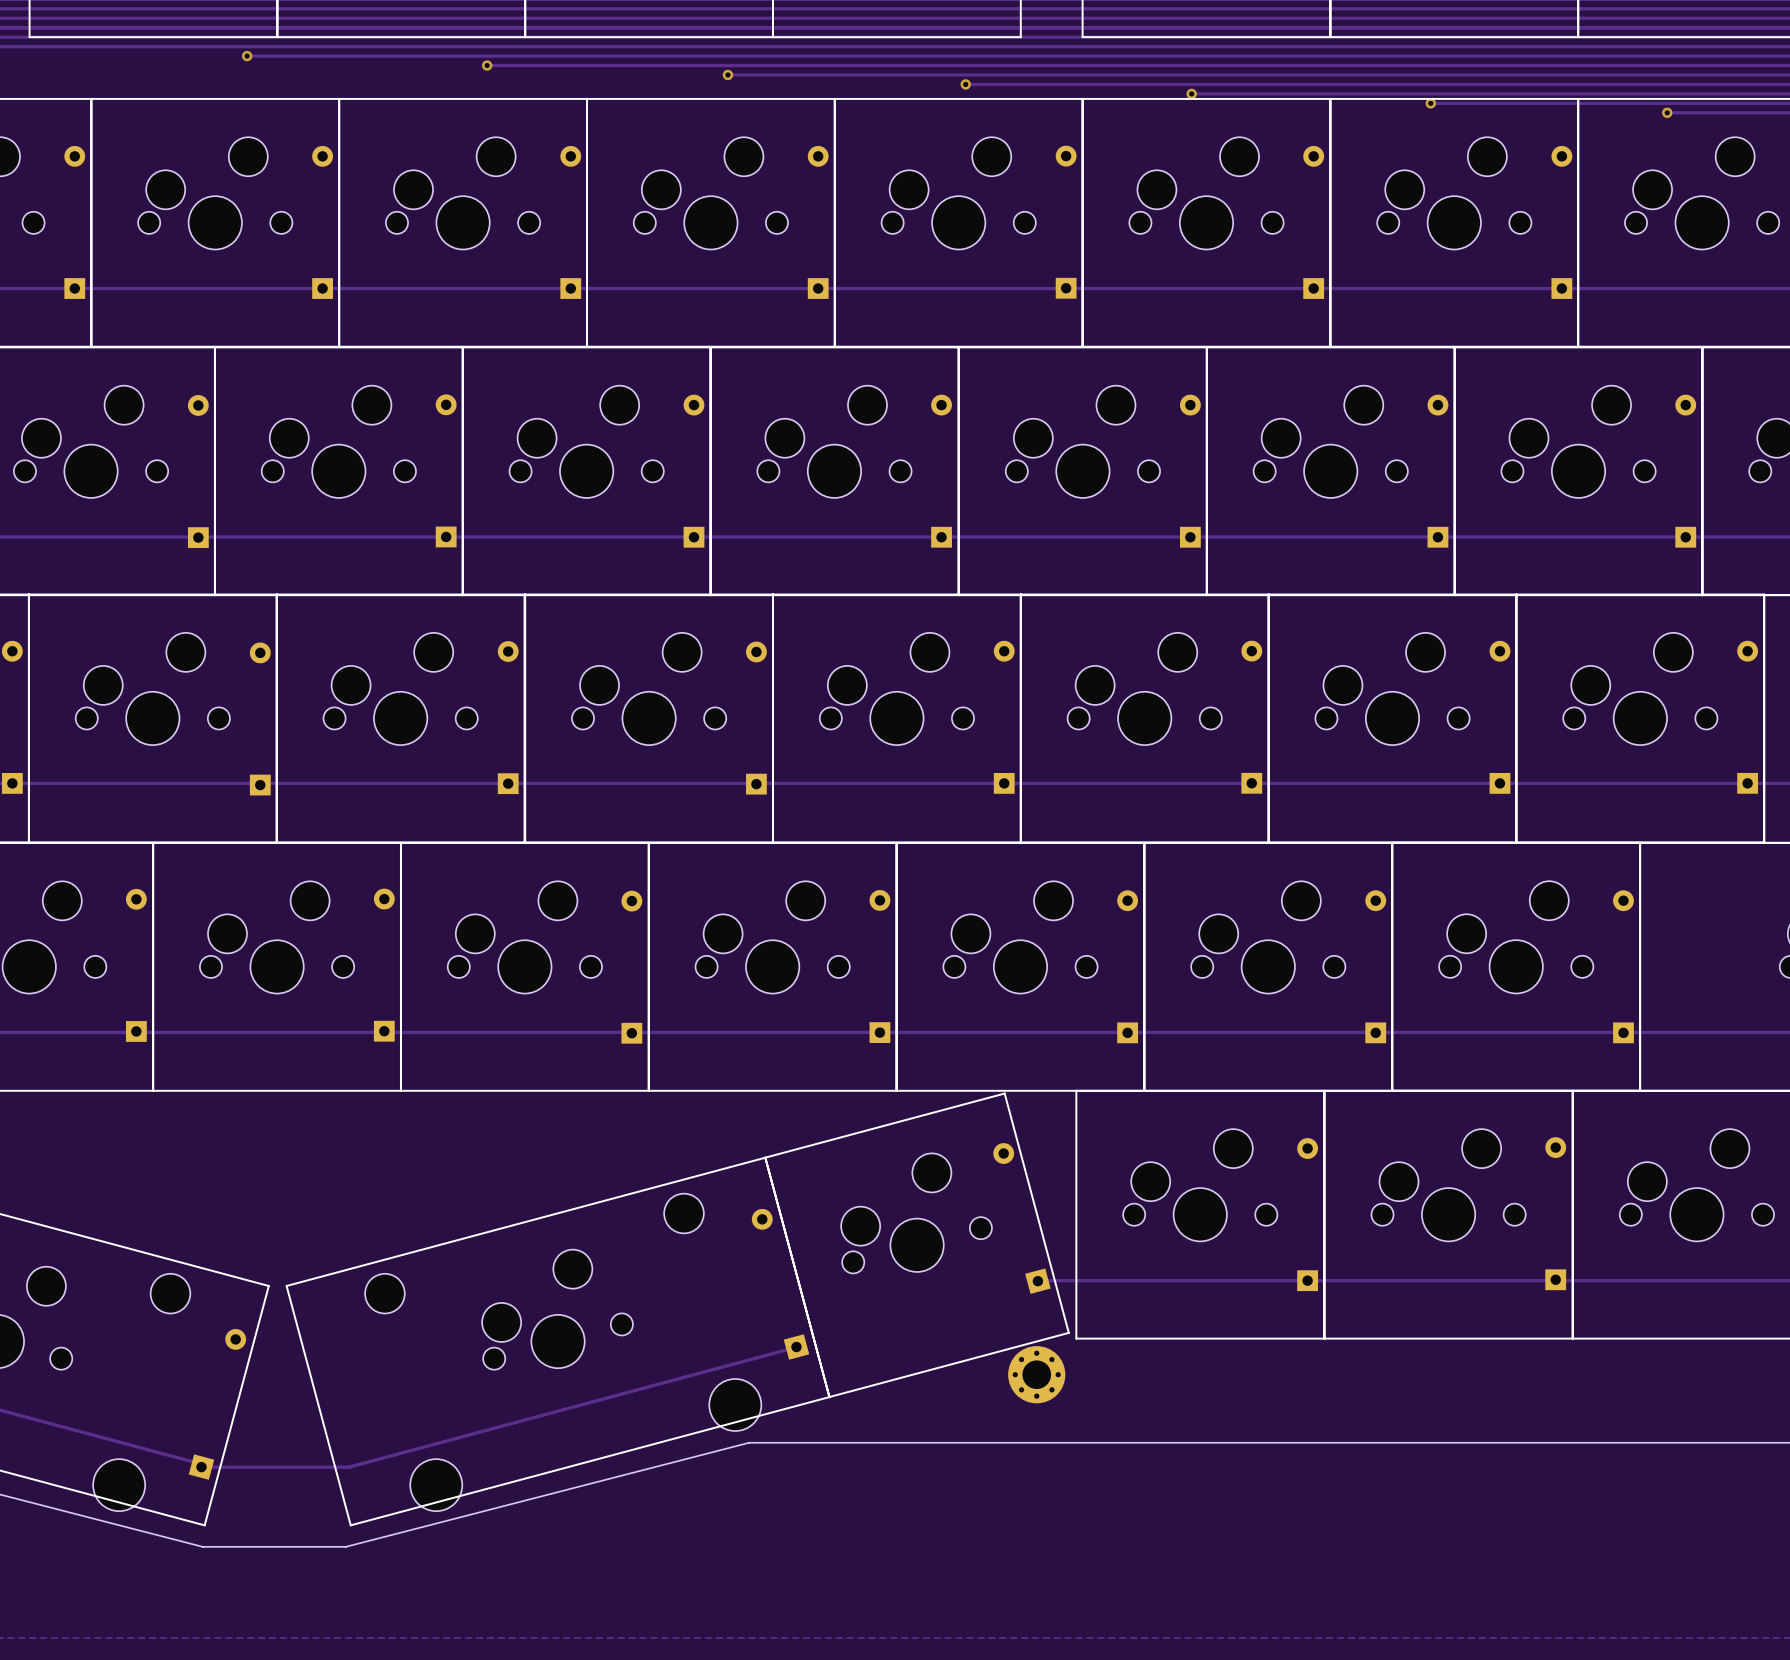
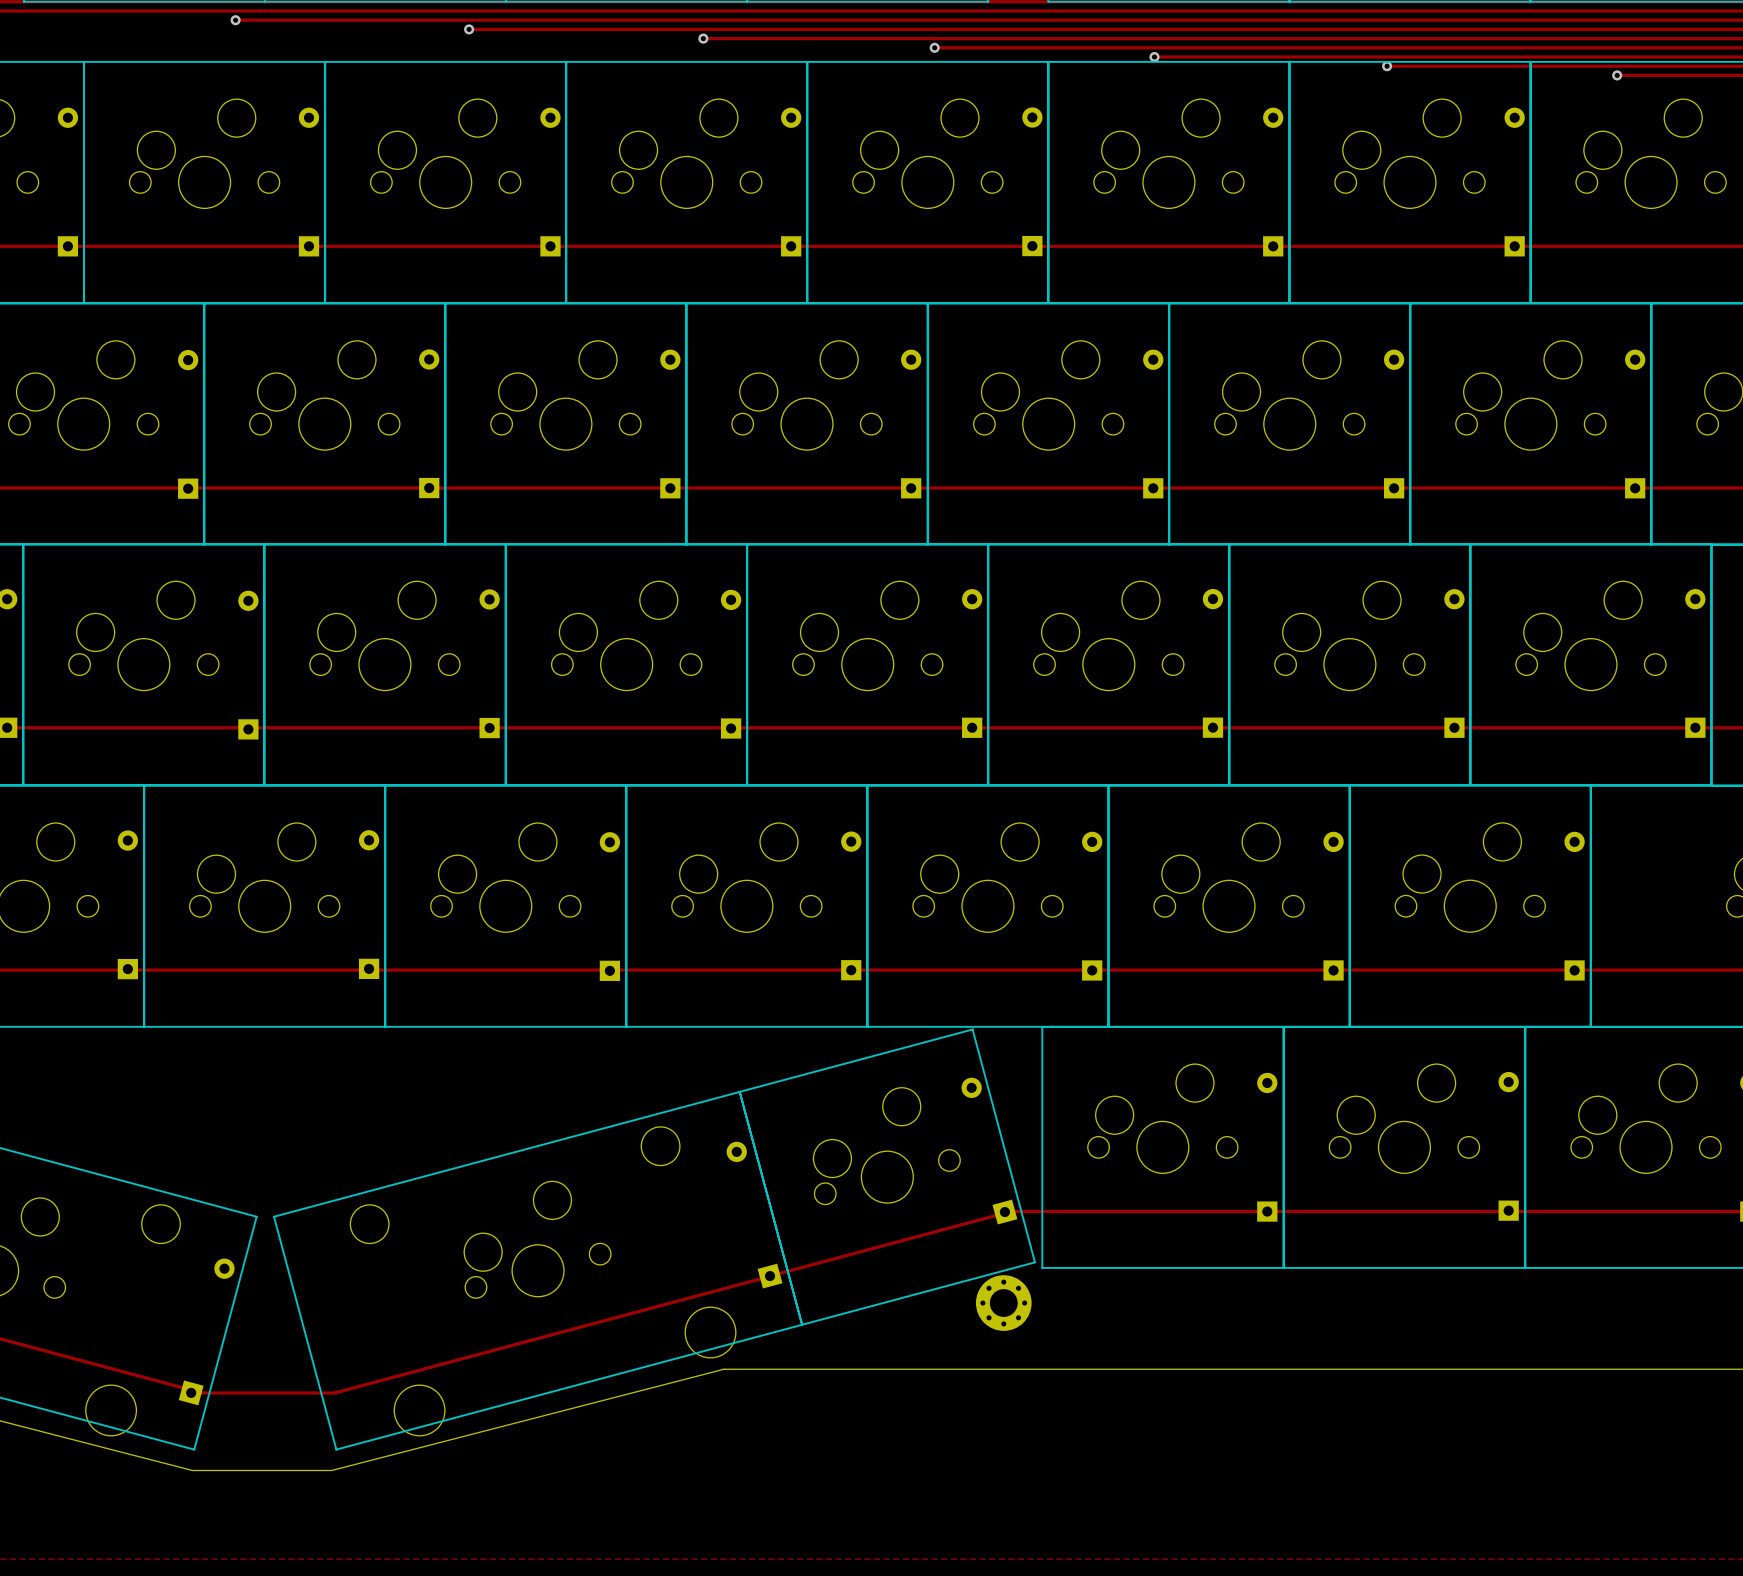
track: none -> (1005, 1213) (770, 1275)

